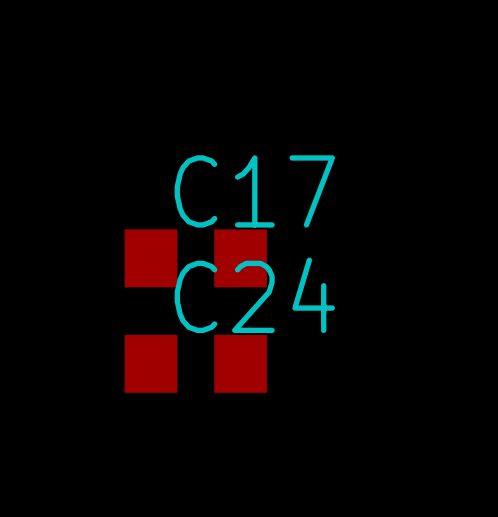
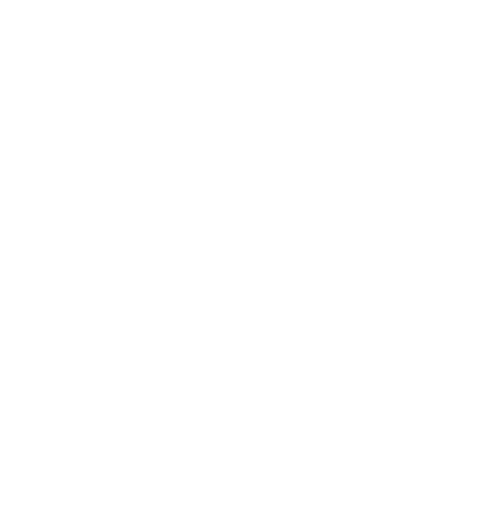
C17: (195, 258) -> none
C24: (195, 363) -> none

